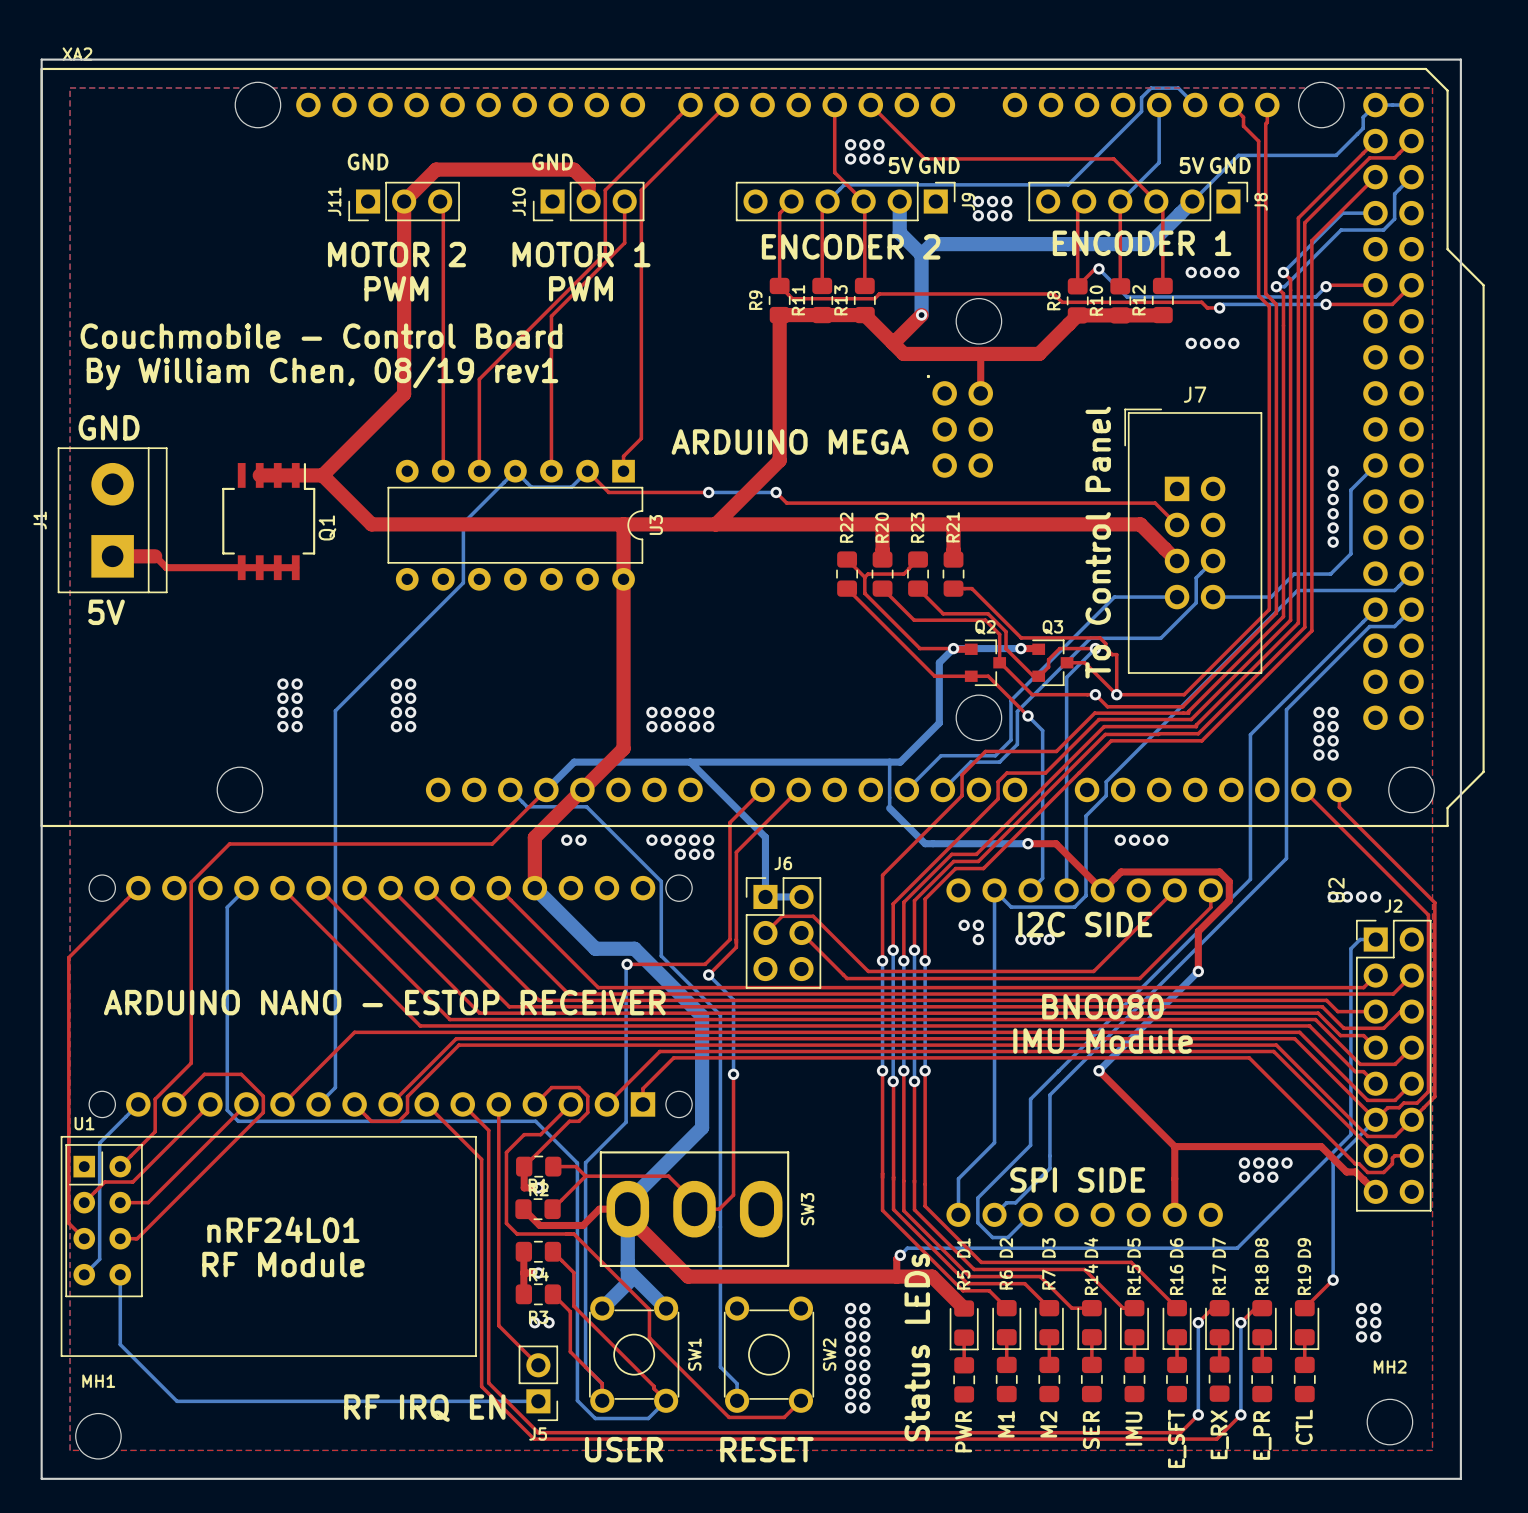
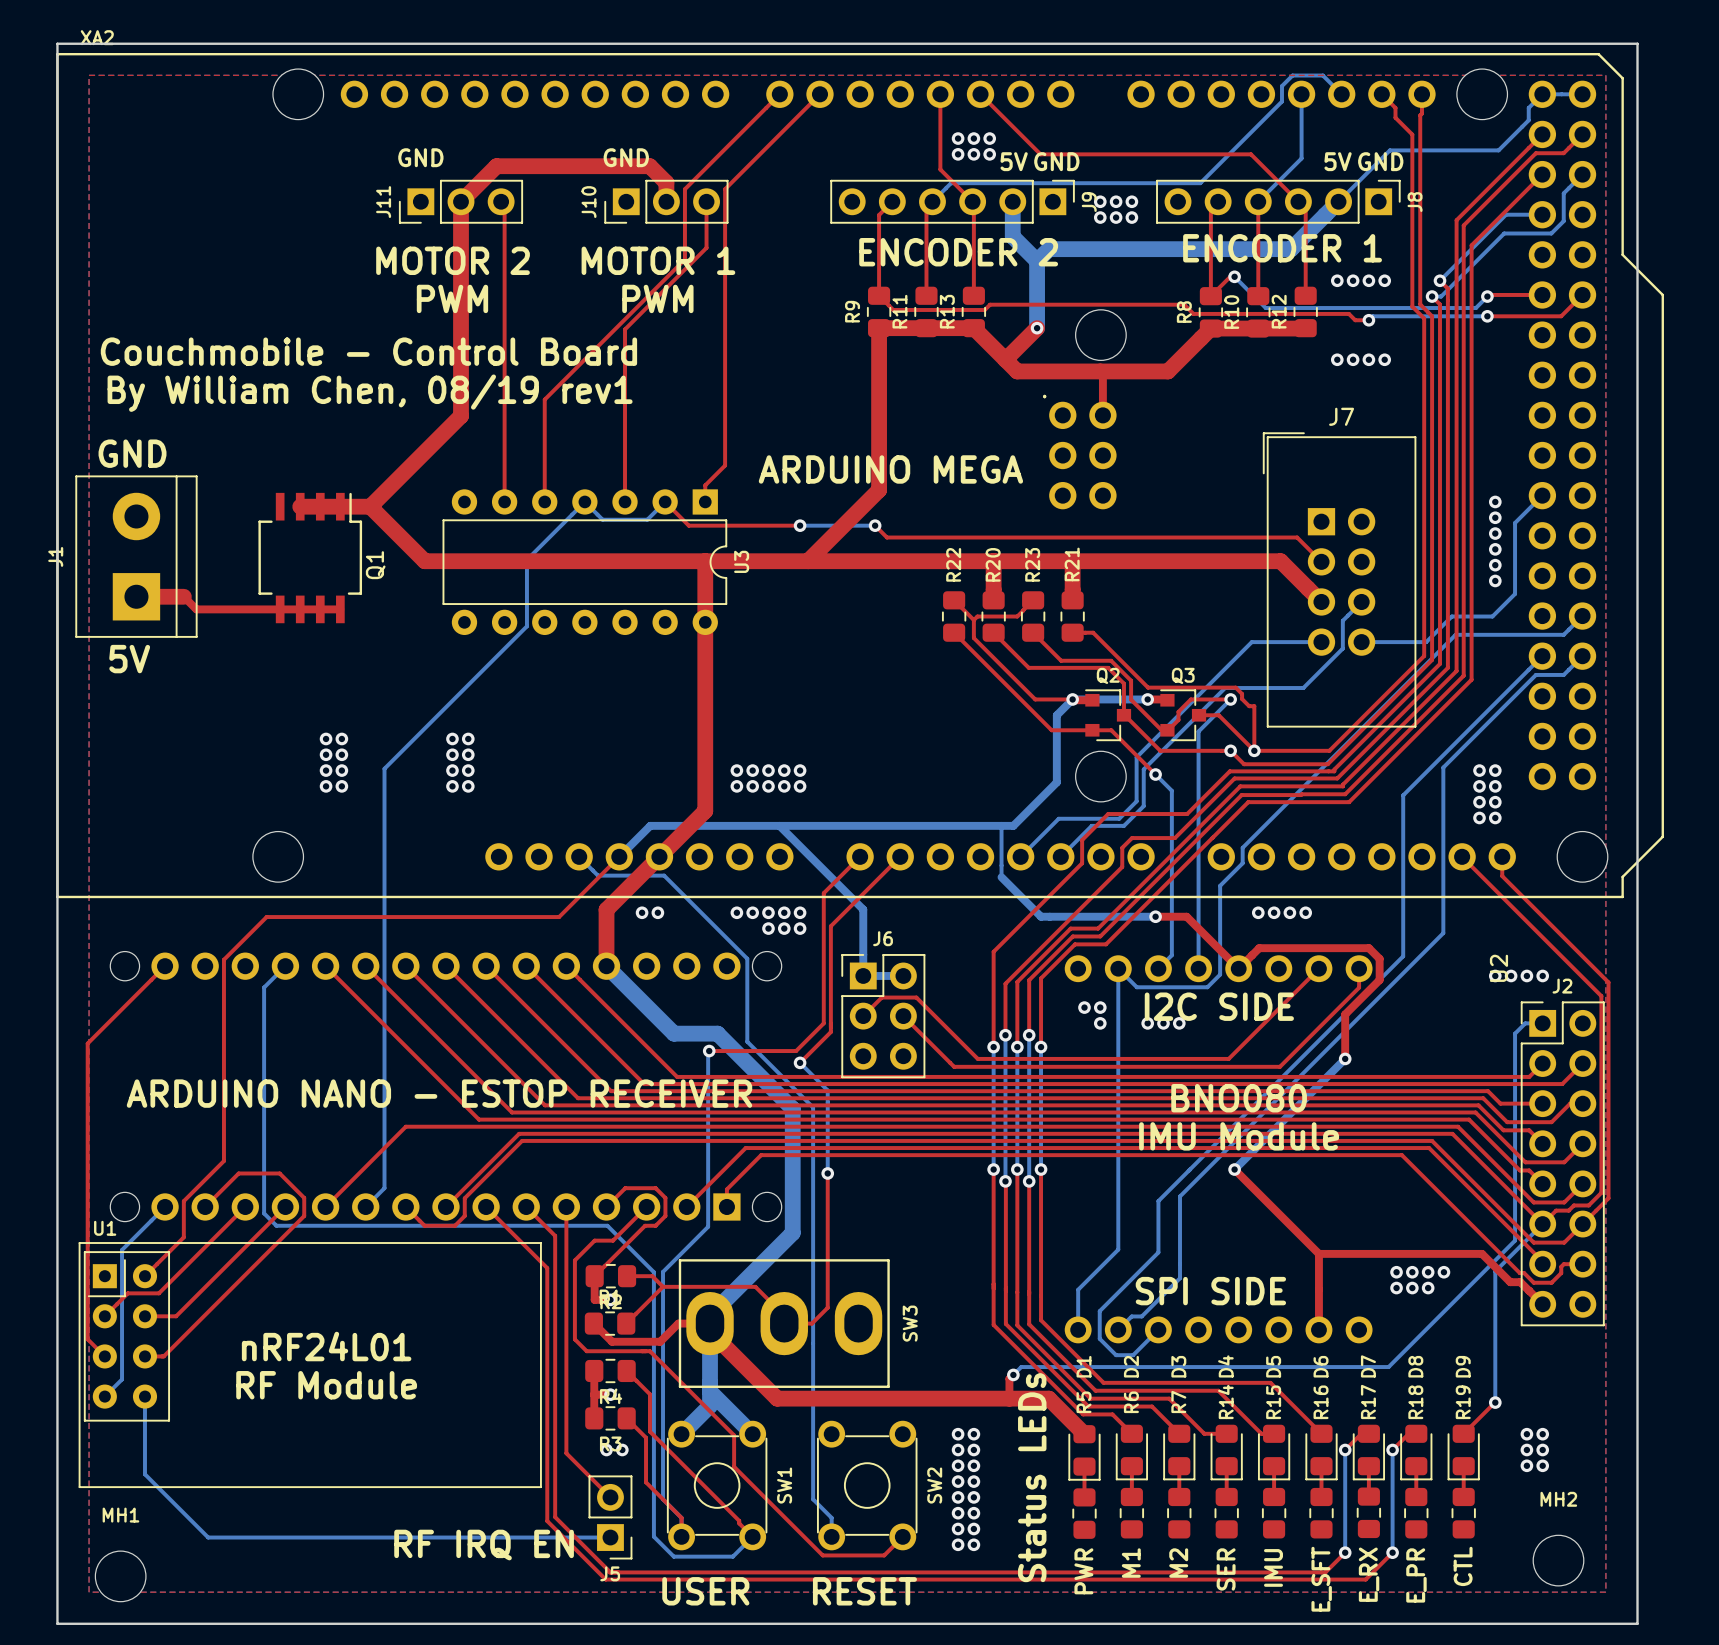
text: To Control Panel (1098, 542) -> none

